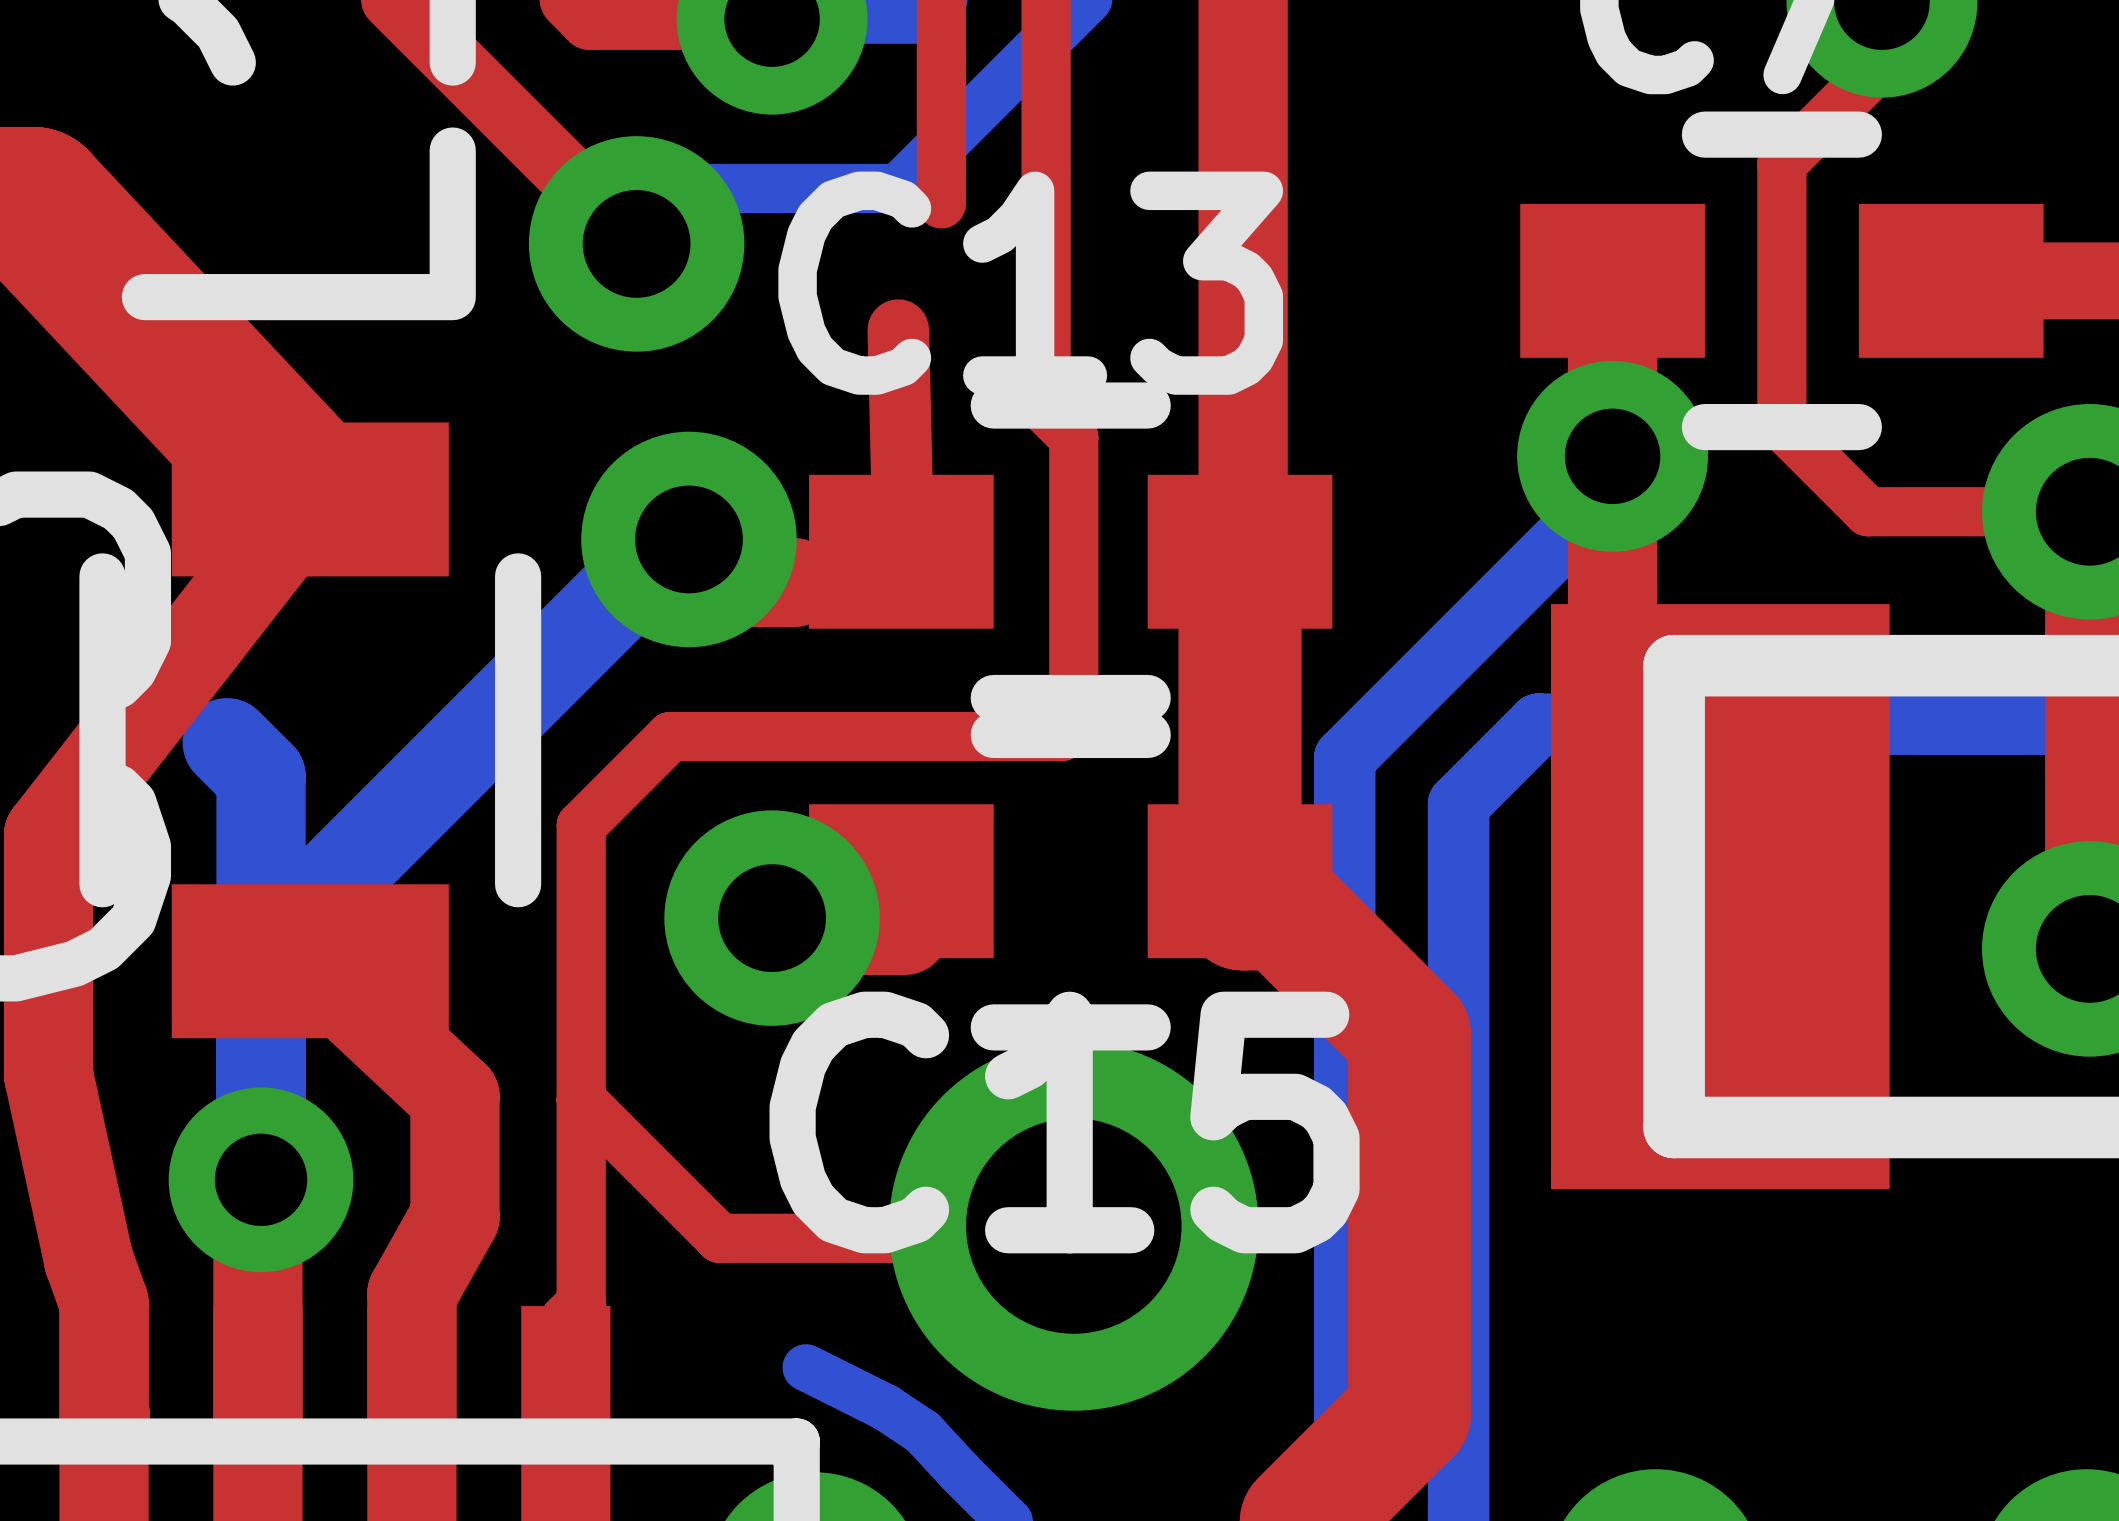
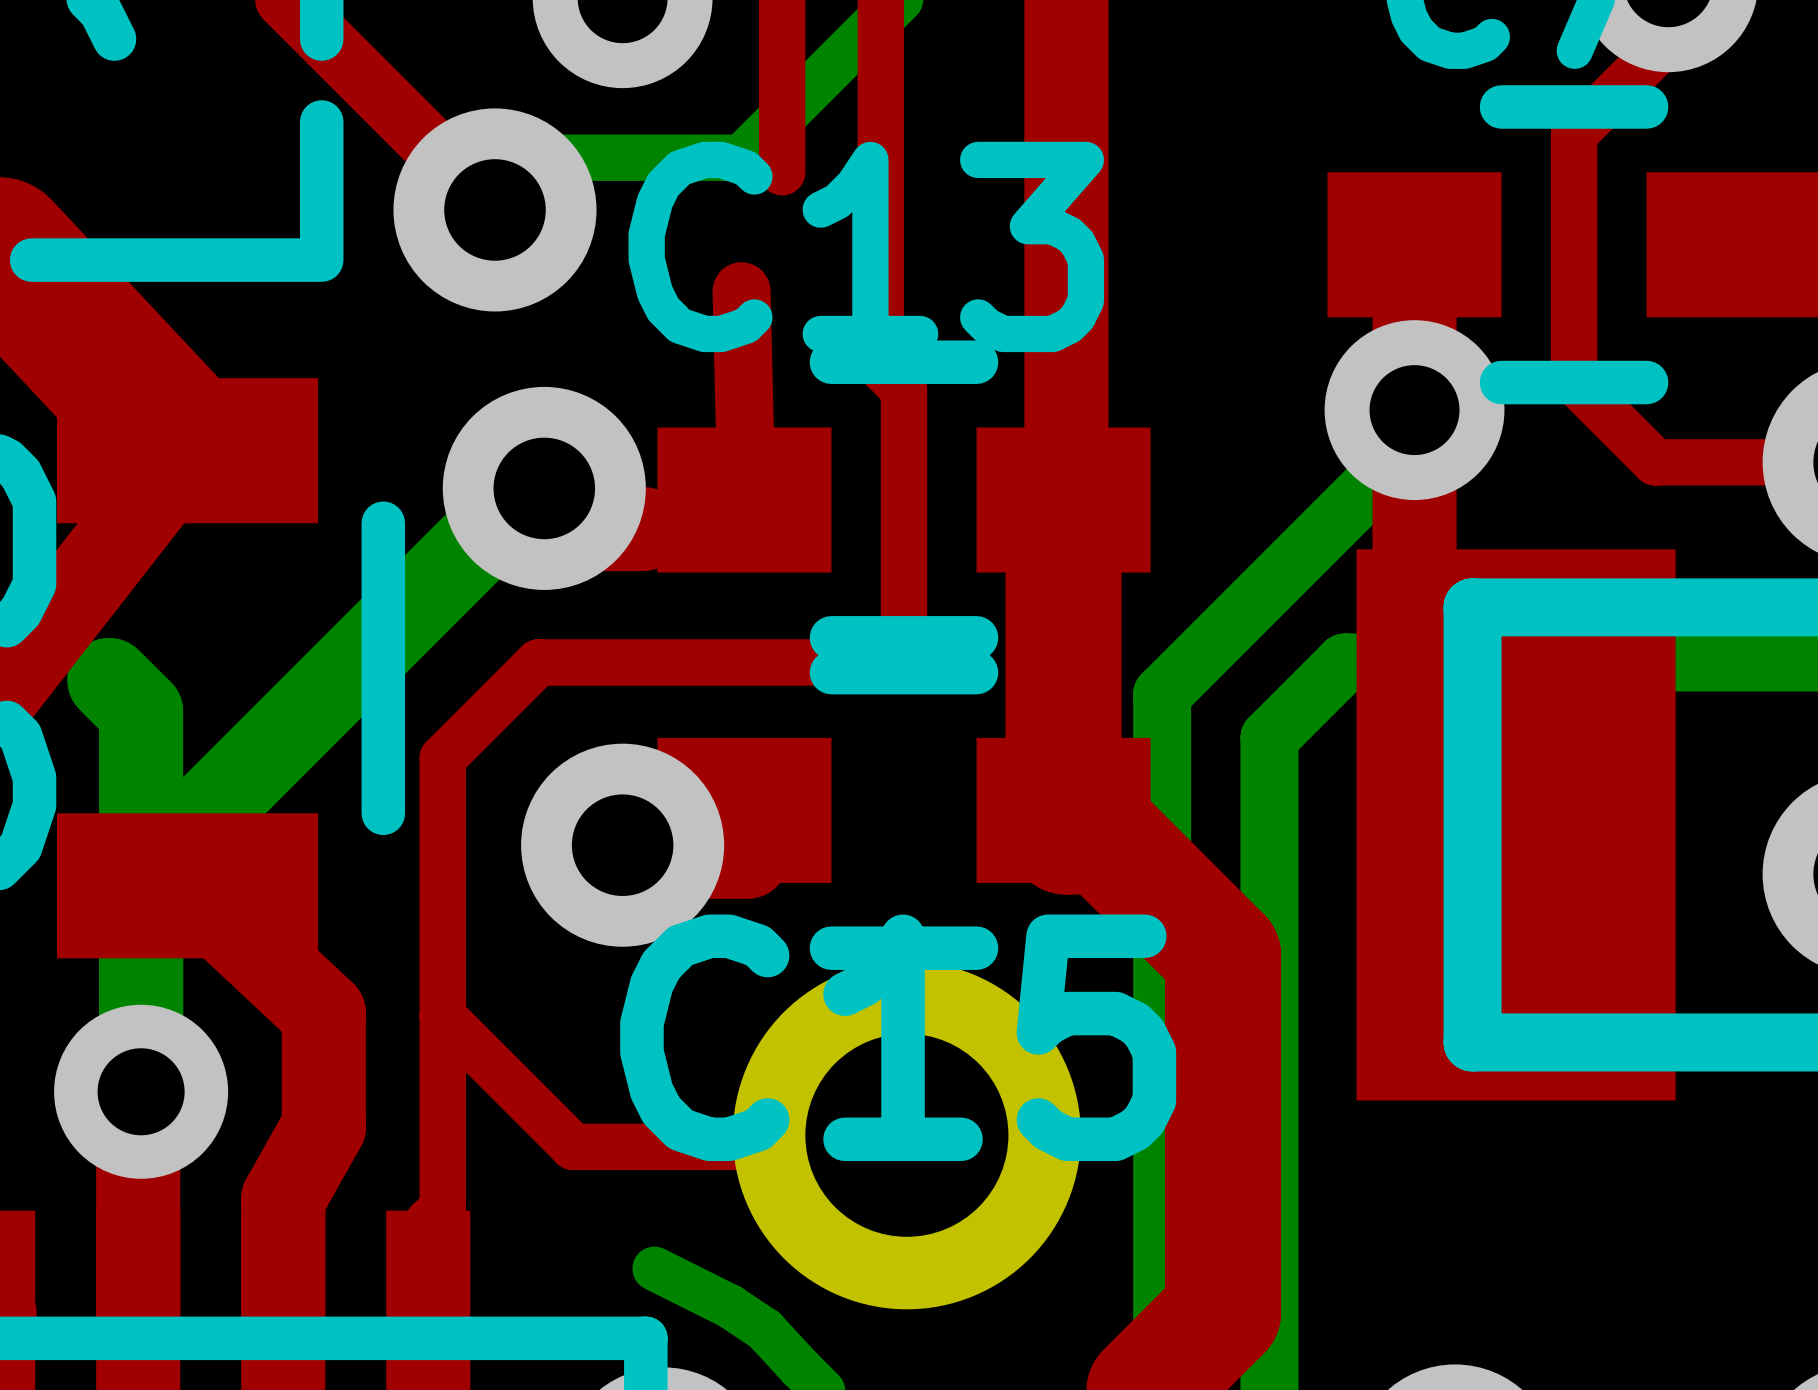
top track: (1073, 437) (1073, 724) (1061, 736) (670, 736) -> (903, 389) (903, 639) (880, 662) (538, 662) (526, 674)

